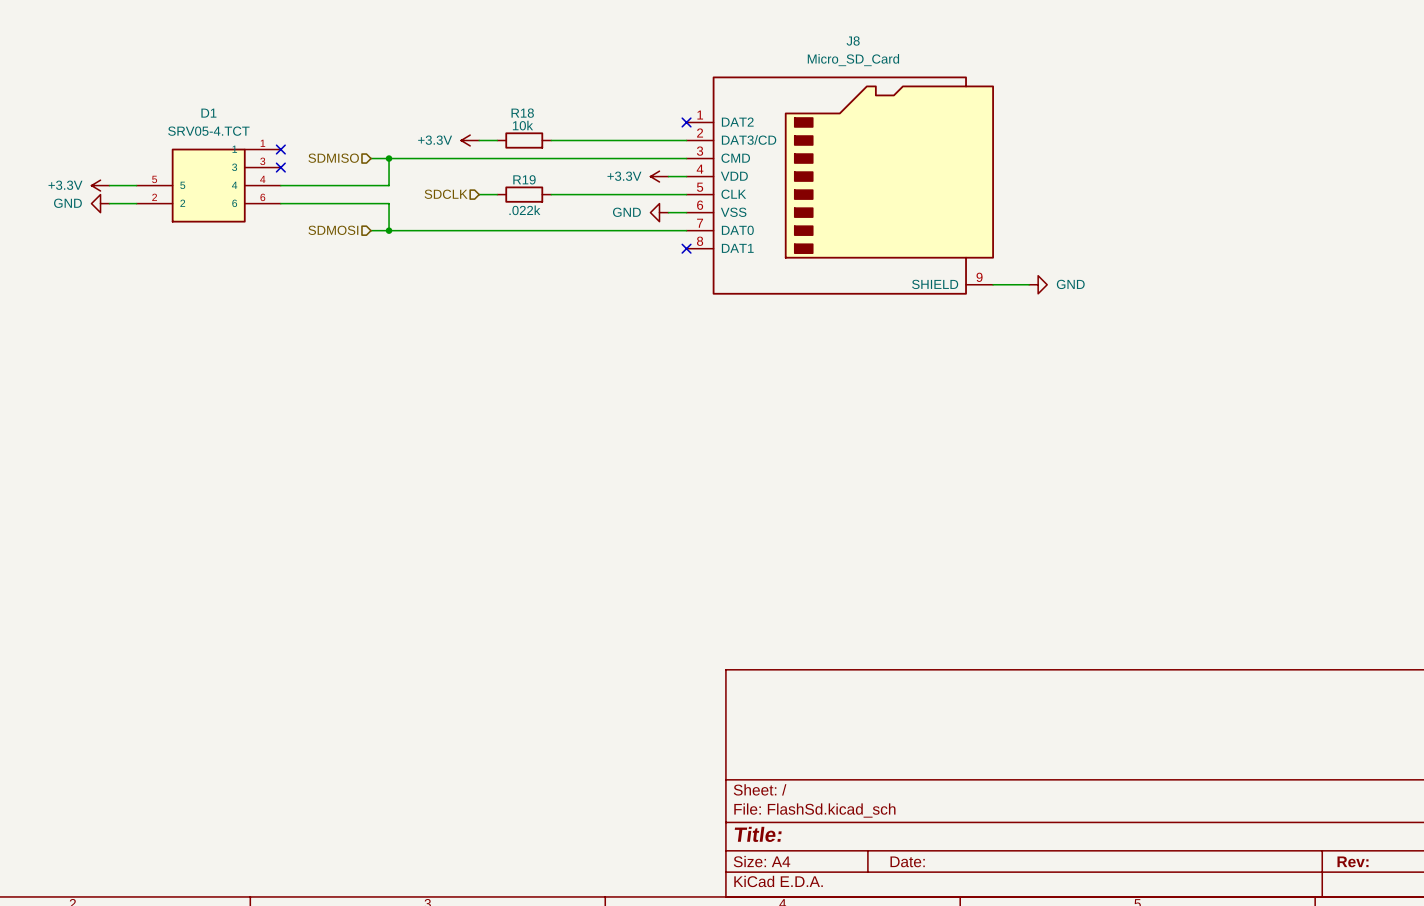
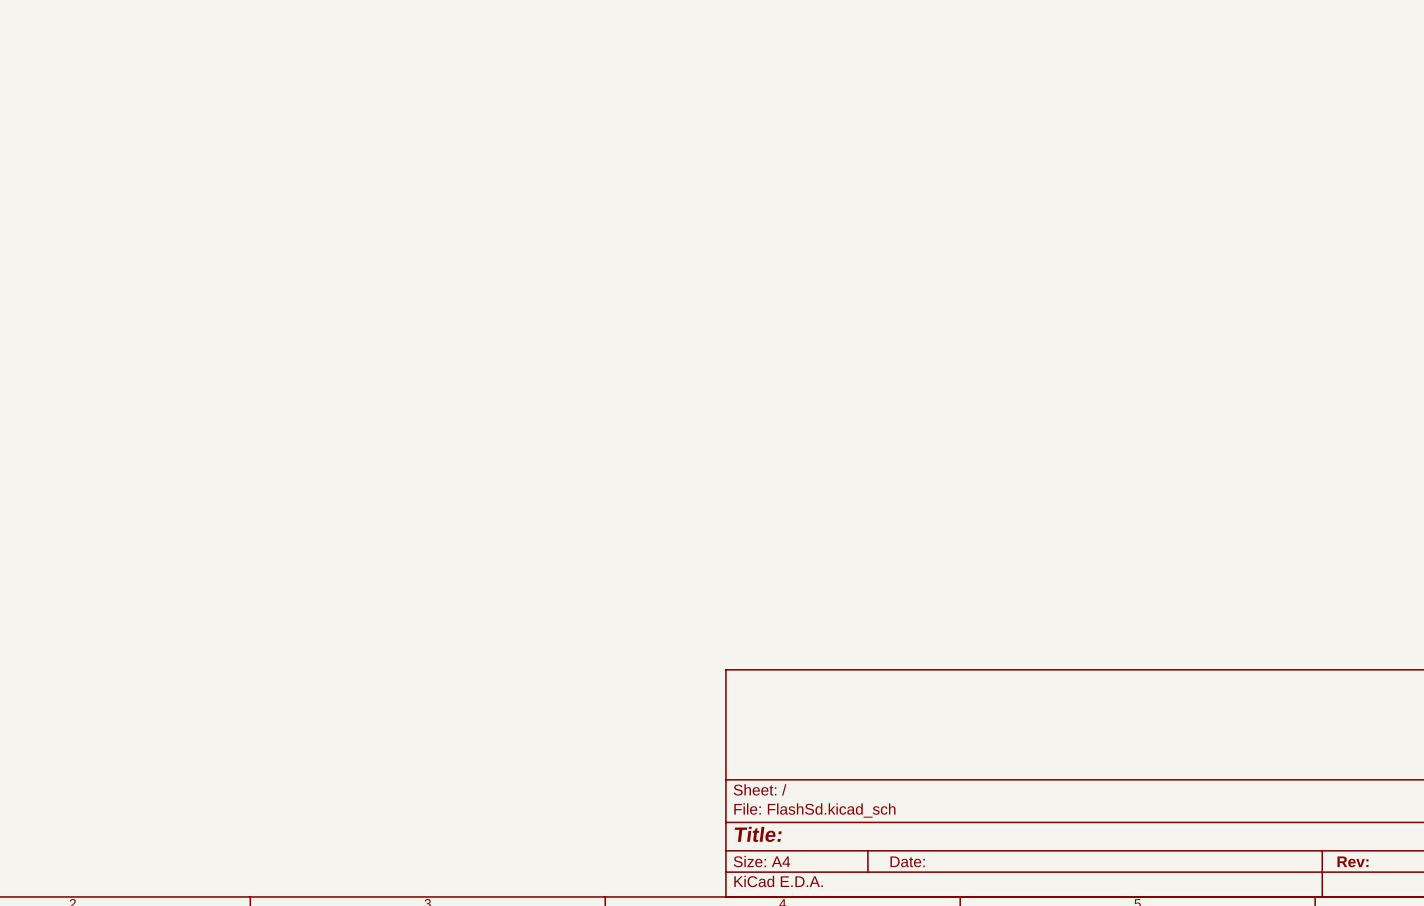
no-connect mark: (686, 122) -> none
power symbol: +3.3V (470, 140) -> none
wire: (479, 140) (497, 140) -> none
R18: 10k (524, 140) -> none
wire: (551, 140) (686, 140) -> none
no-connect mark: (280, 149) -> none
hierarchical label: SDMISO (333, 158) -> none
wire: (370, 158) (686, 158) -> none
wire: (389, 158) (389, 185) (280, 185) -> none
junction: (389, 158) -> none
no-connect mark: (280, 167) -> none
power symbol: +3.3V (659, 176) -> none
wire: (668, 176) (686, 176) -> none
power symbol: +3.3V (100, 185) -> none
wire: (109, 185) (136, 185) -> none
D1: SRV05-4.TCT (208, 185) -> none
J8: Micro_SD_Card (840, 185) -> none
hierarchical label: SDCLK (446, 194) -> none
wire: (479, 194) (497, 194) -> none
R19: .022k (524, 194) -> none
wire: (551, 194) (686, 194) -> none
power symbol: GND (100, 203) -> none
wire: (109, 203) (136, 203) -> none
wire: (280, 203) (389, 203) (389, 230) -> none
power symbol: GND (659, 212) -> none
wire: (668, 212) (686, 212) -> none
hierarchical label: SDMOSI (333, 230) -> none
wire: (370, 230) (686, 230) -> none
junction: (389, 230) -> none
no-connect mark: (686, 248) -> none
wire: (993, 284) (1029, 284) -> none
power symbol: GND (1038, 284) -> none

